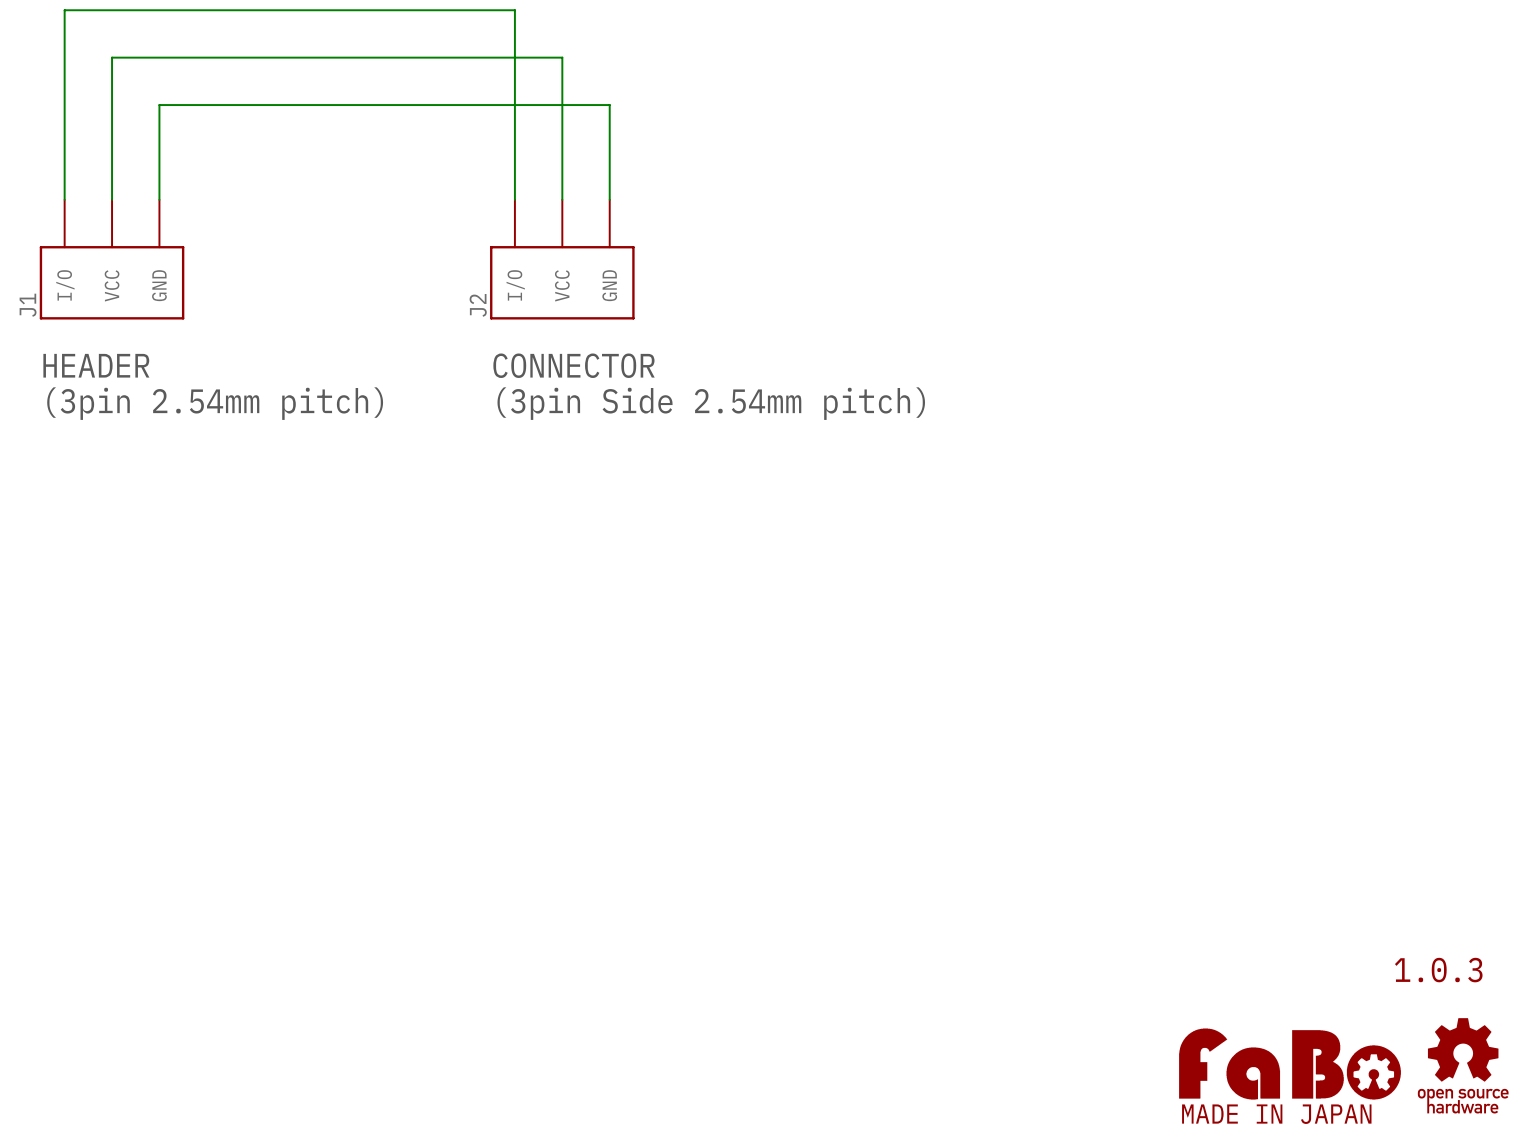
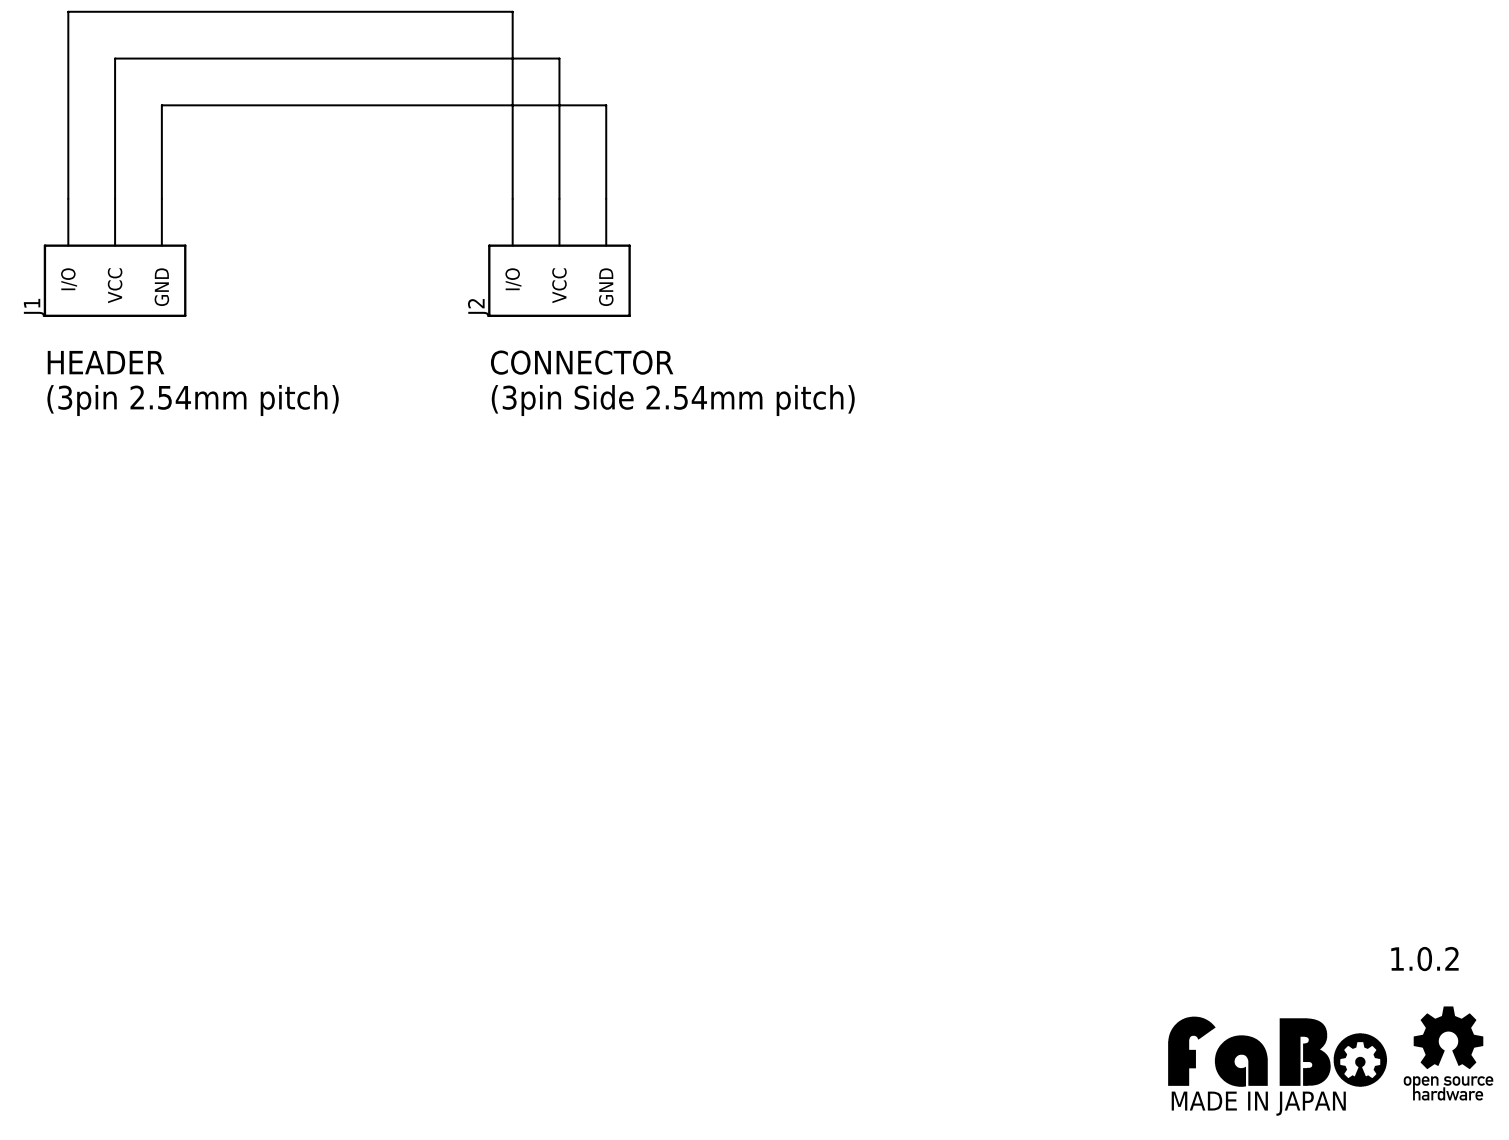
text: 1.0.3 (1438, 970) -> 1.0.2 (1424, 959)

